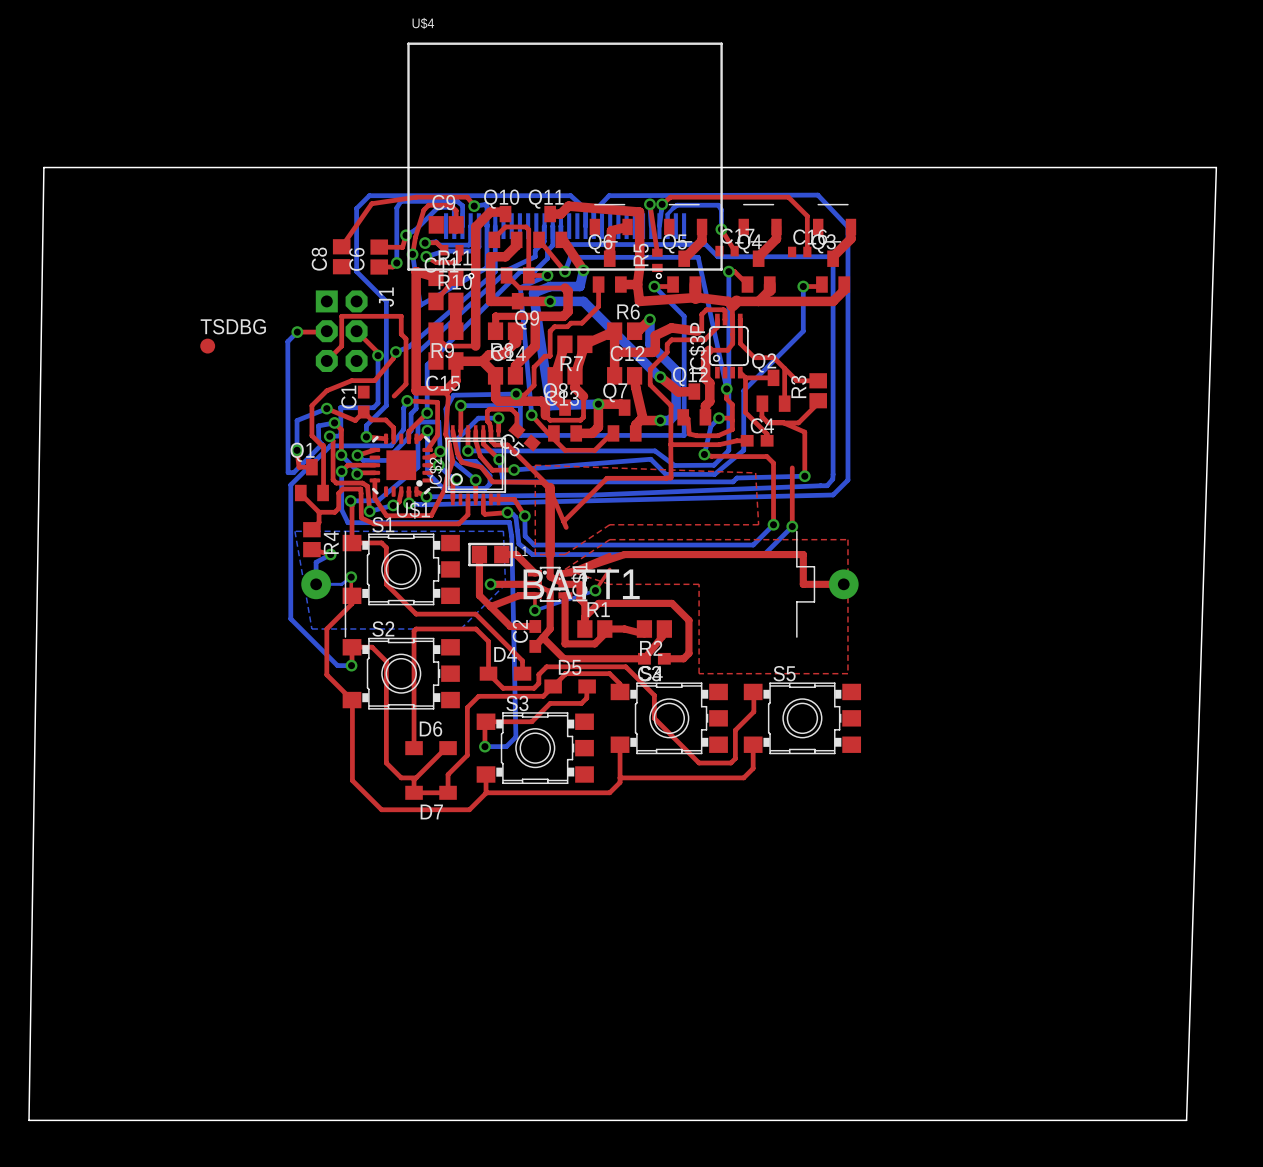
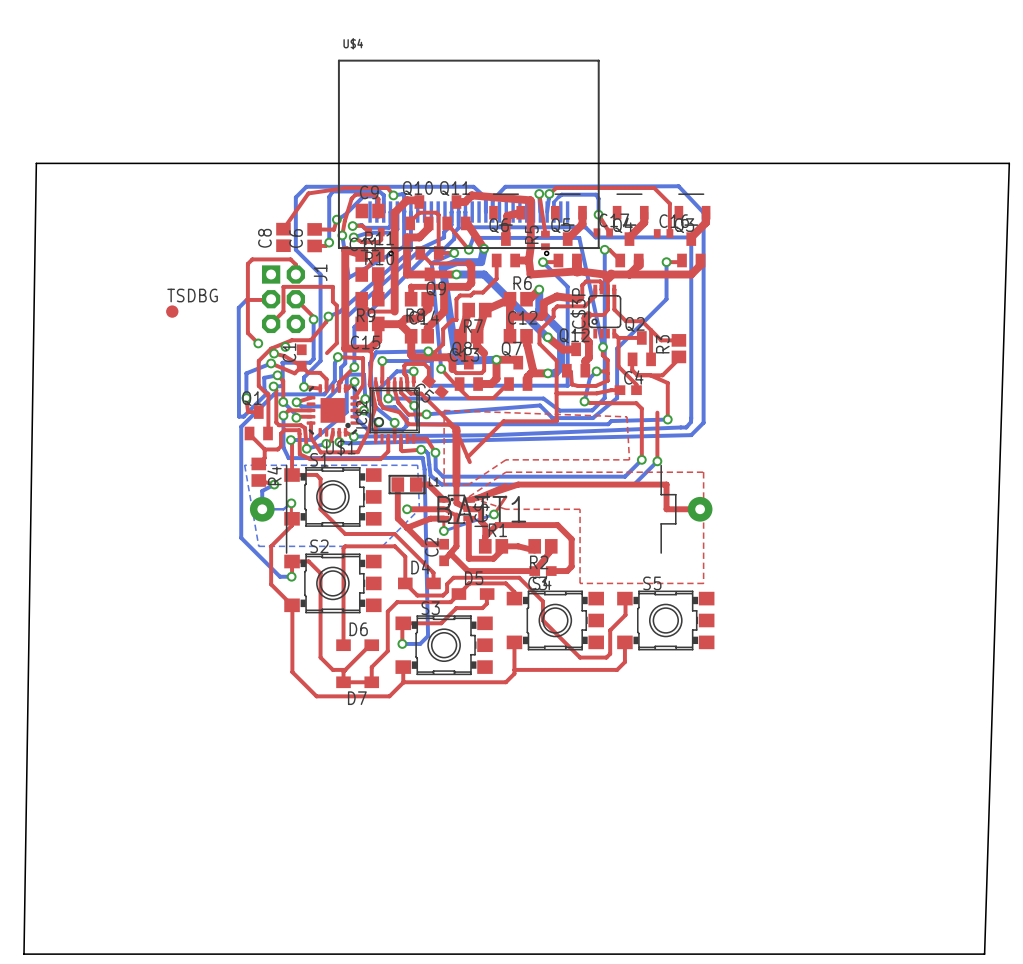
top track: none -> (295, 274) (295, 264) (290, 259) (252, 259) (247, 263) (247, 333) (258, 343)
via: (297, 332) -> none
via: none -> (258, 343)
via: none -> (285, 346)
top track: none -> (274, 353) (284, 356) (301, 366)
via: none -> (274, 353)

